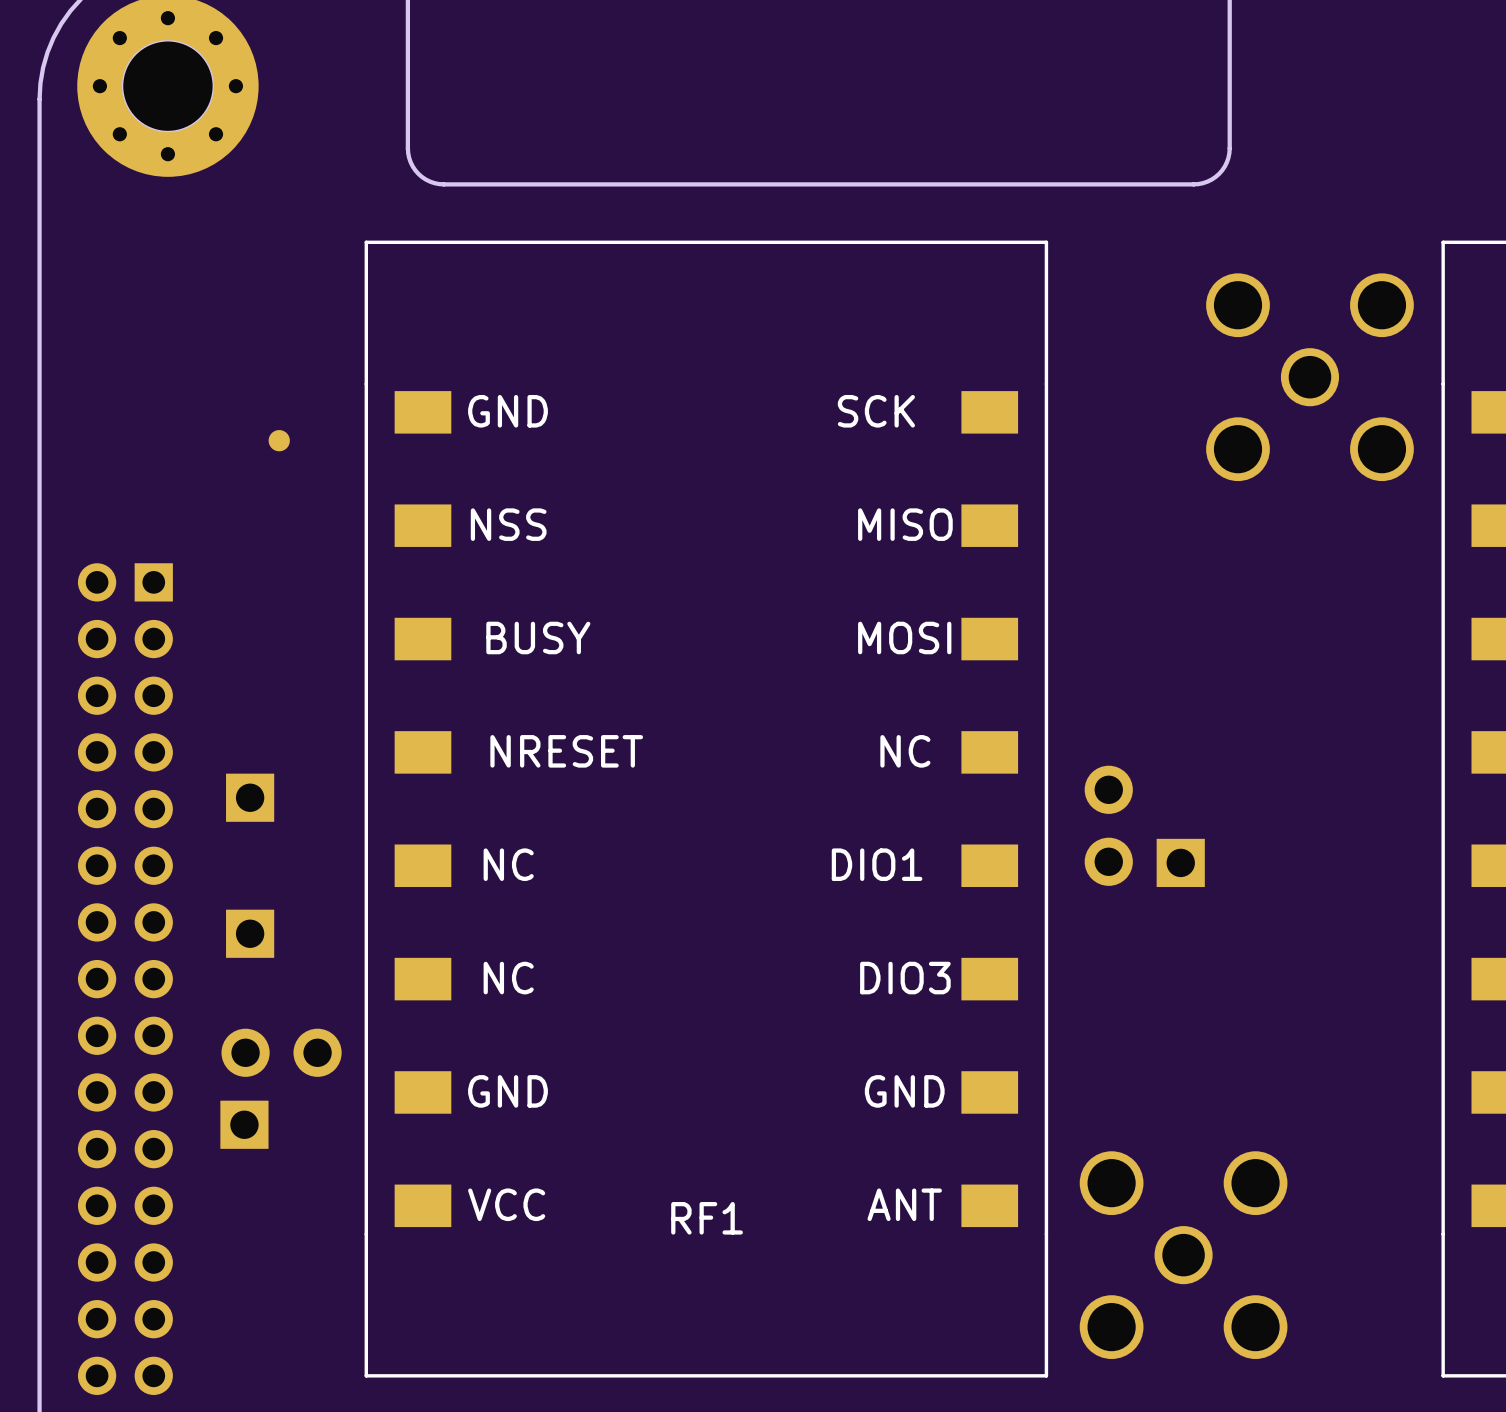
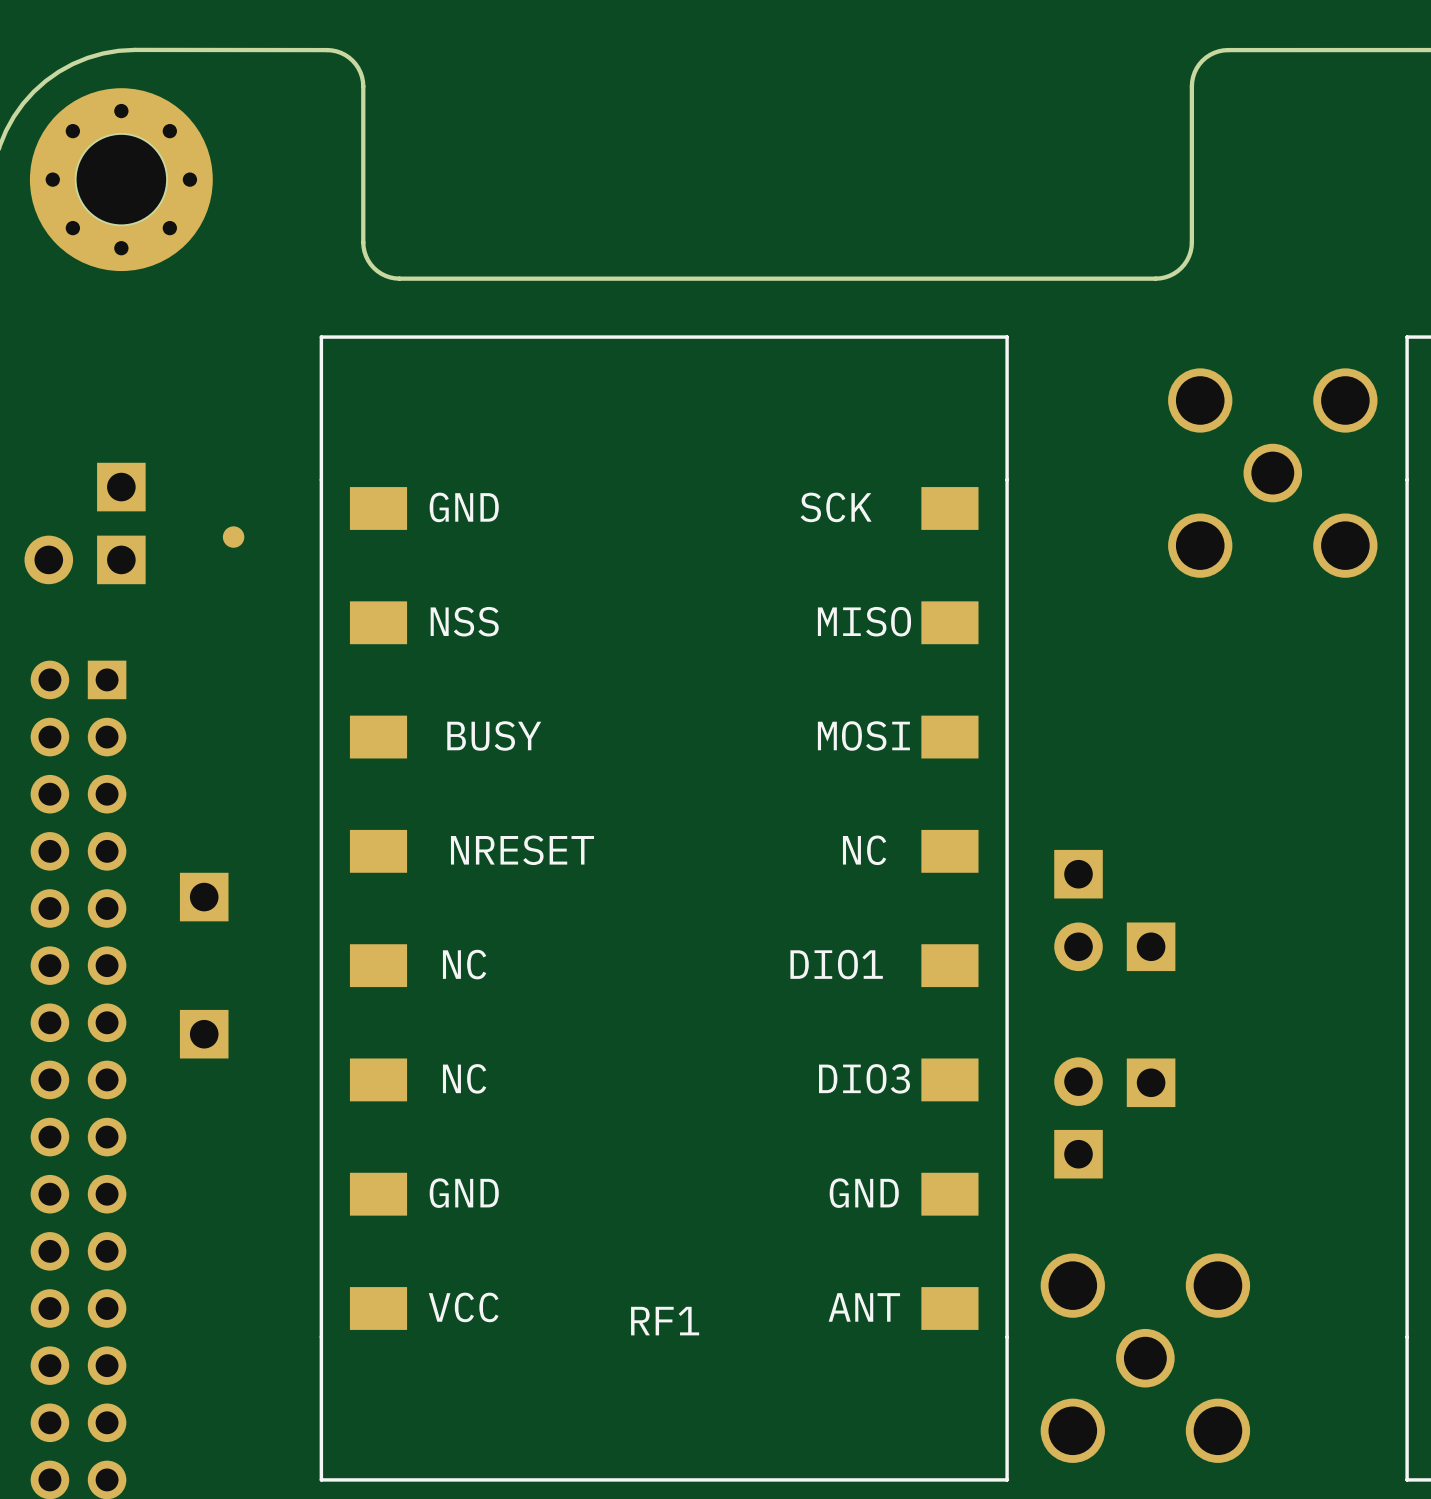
part: none -> (121, 487)
part: none -> (85, 559)
part: none -> (1078, 910)
part: (1144, 826) -> none
part: none -> (1151, 946)
part: none -> (1151, 1082)
part: none -> (1078, 1117)
part: (281, 1088) -> none

